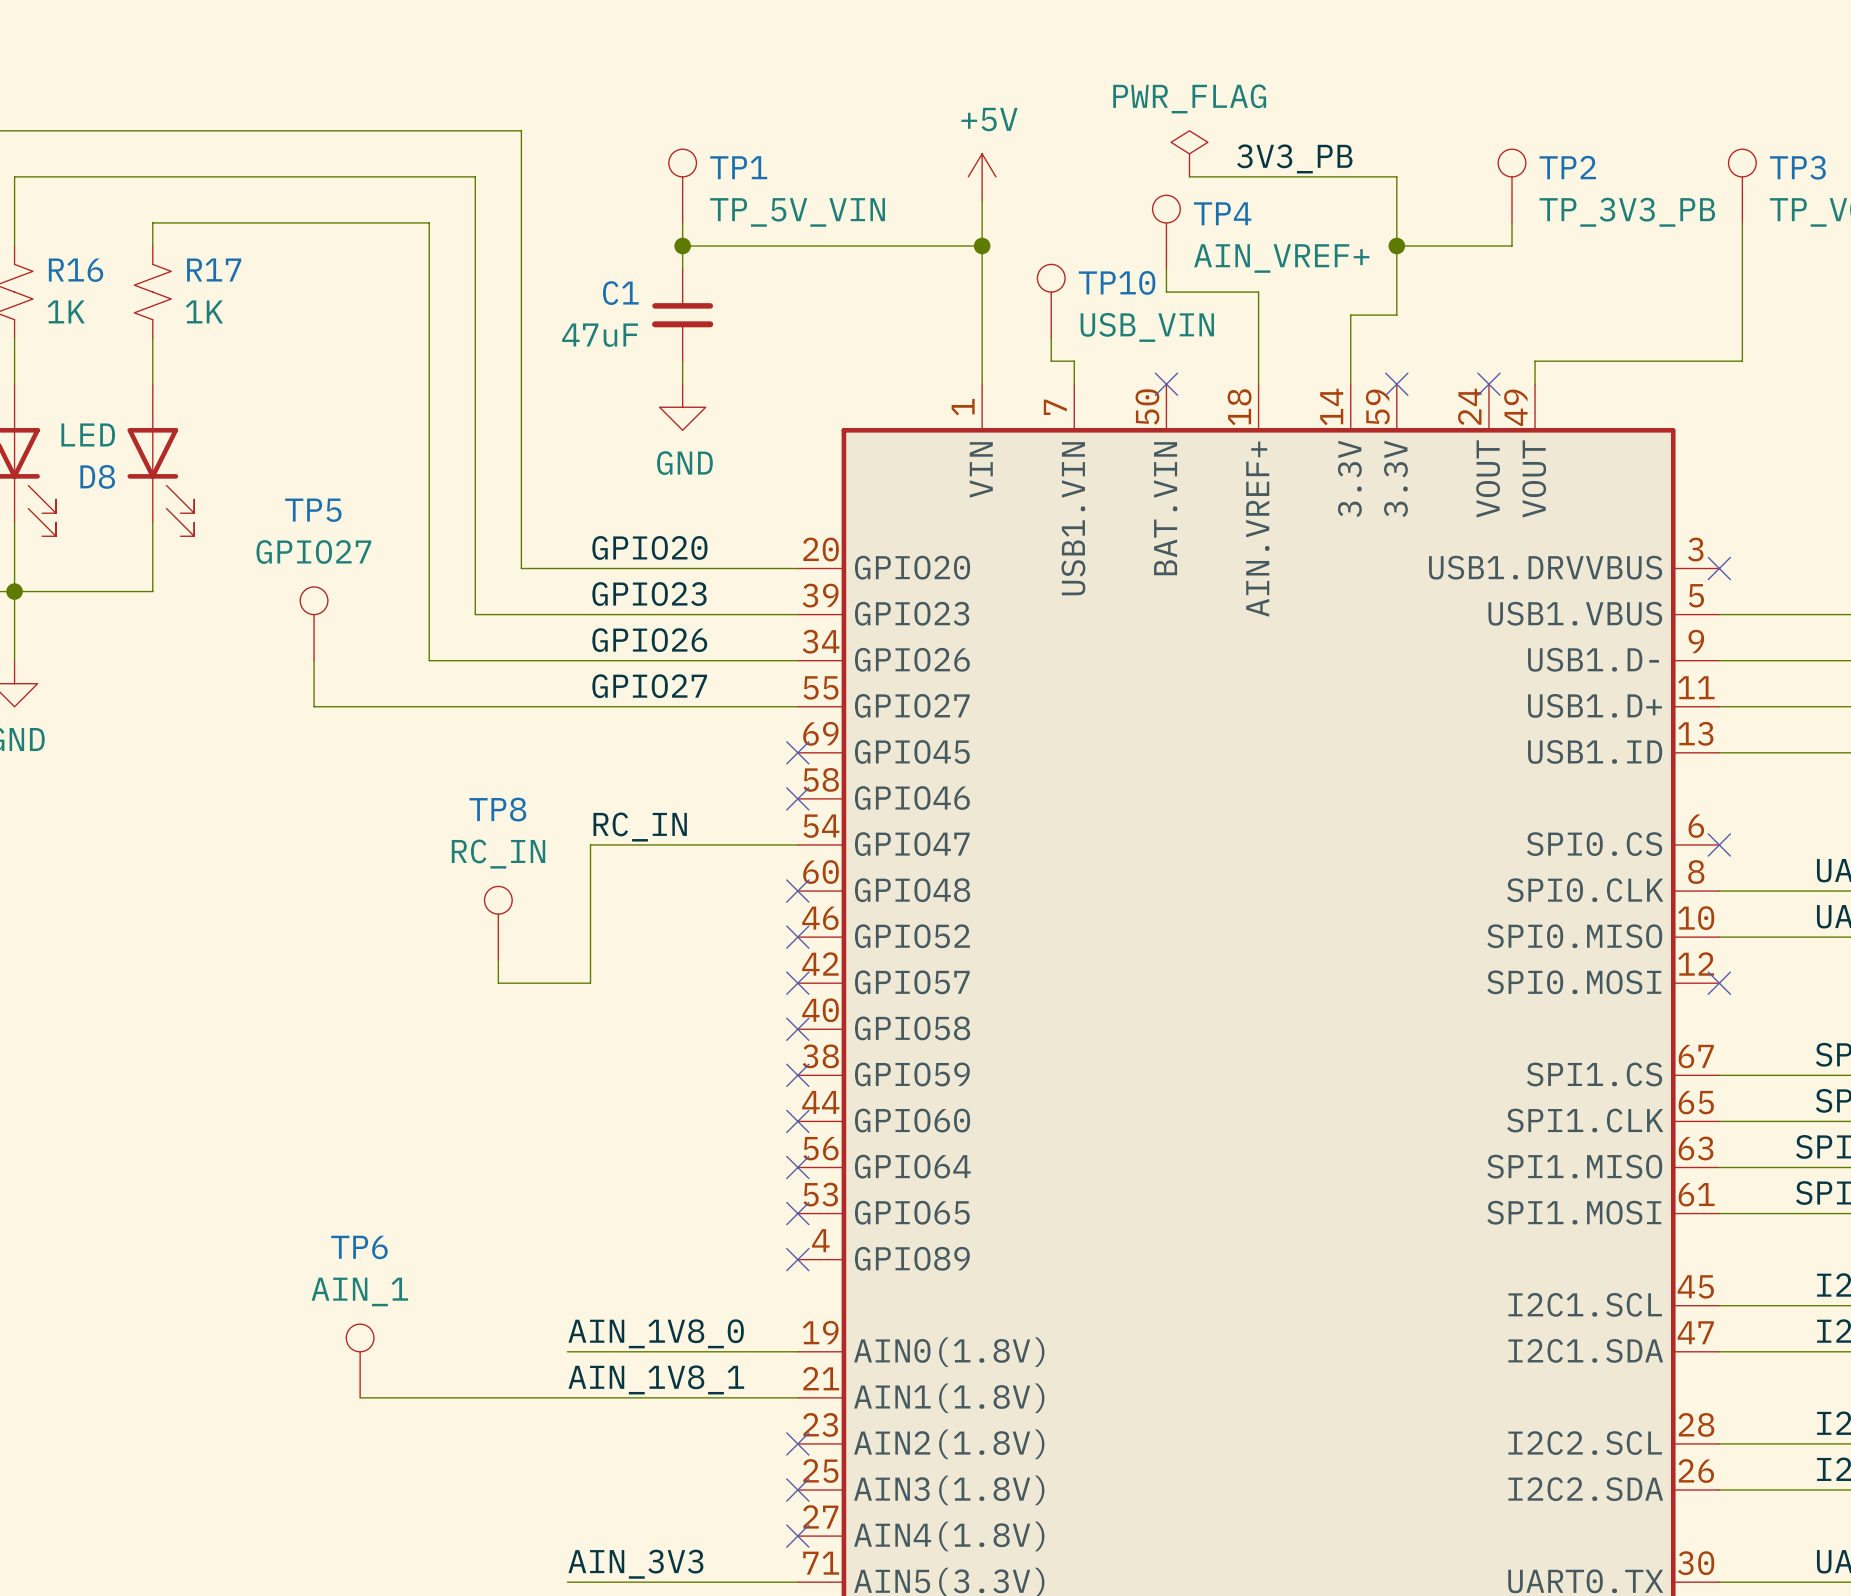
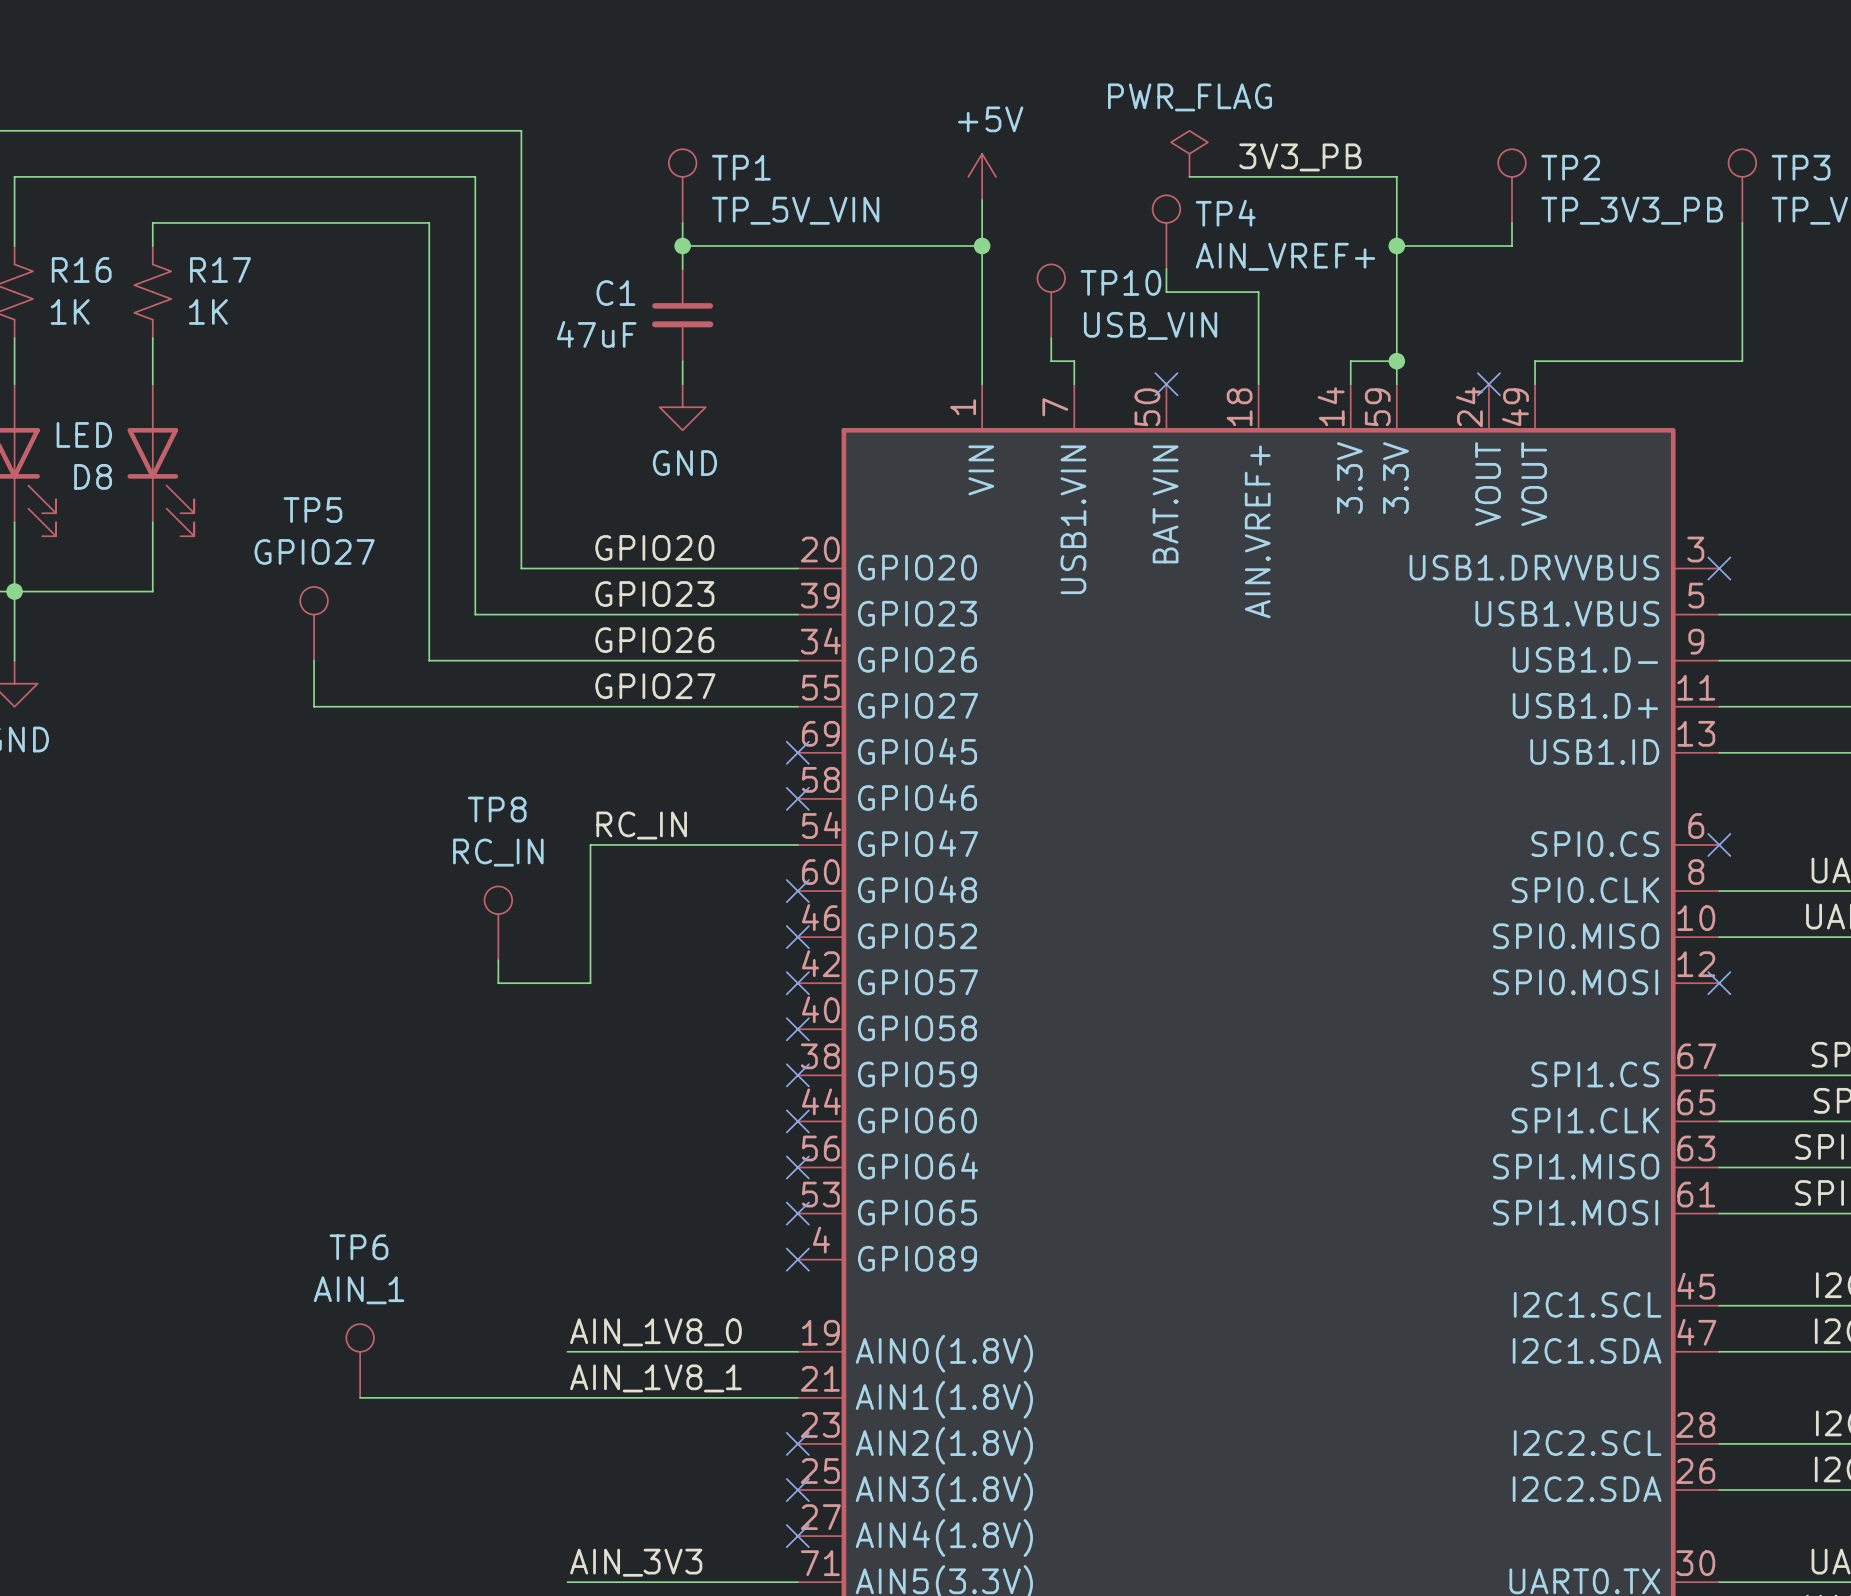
wire: (1396, 315) (1350, 315) (1350, 361) -> (1396, 361) (1350, 361)
wire: none -> (1396, 315) (1396, 384)
junction: none -> (1396, 361)
no-connect mark: (1396, 384) -> none

